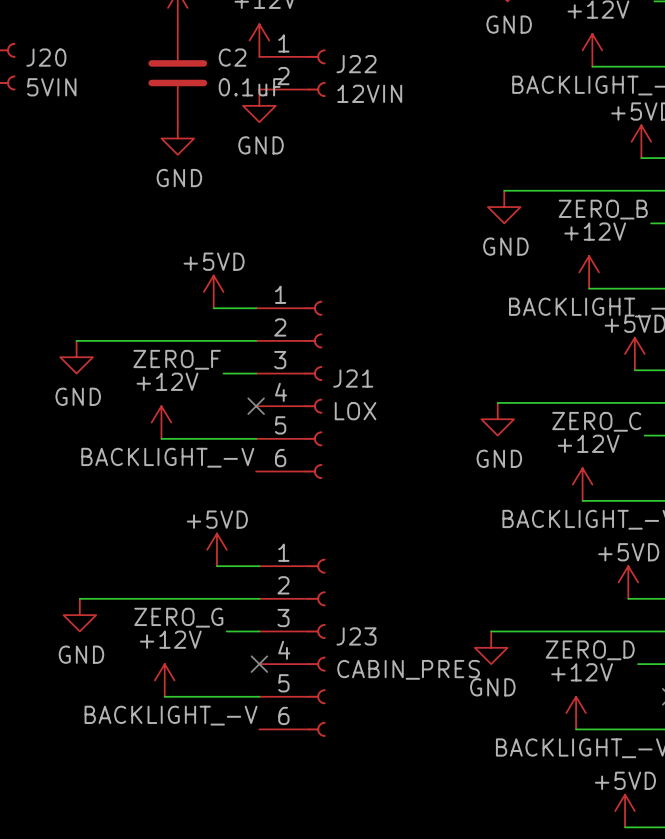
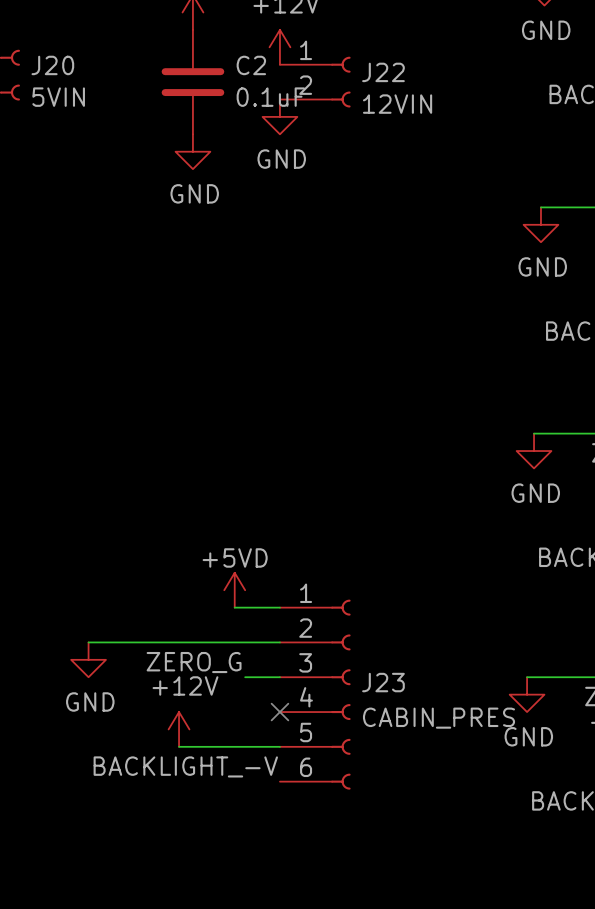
power symbol: +5VD (213, 291) -> none
wire: (213, 308) (256, 308) -> none
wire: (76, 340) (256, 340) -> none
power symbol: GND (76, 357) -> none
label: ZERO_F (177, 359) -> none
wire: (223, 373) (256, 373) -> none
J21: LOX (289, 389) -> none
no-connect mark: (256, 406) -> none
power symbol: +12V (161, 422) -> none
wire: (161, 438) (256, 438) -> none
label: BACKLIGHT_-V (167, 457) -> none

